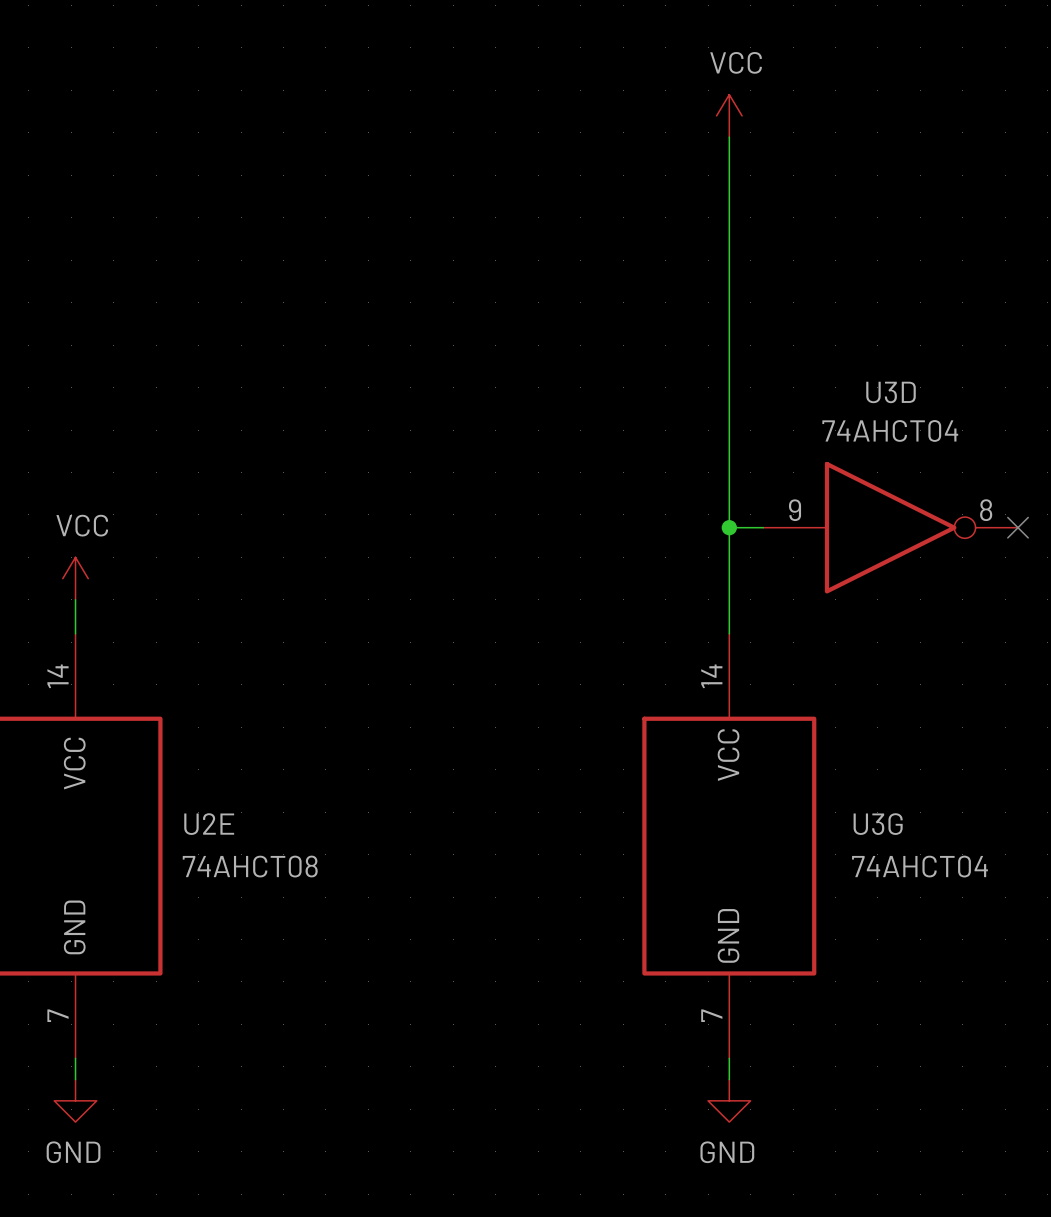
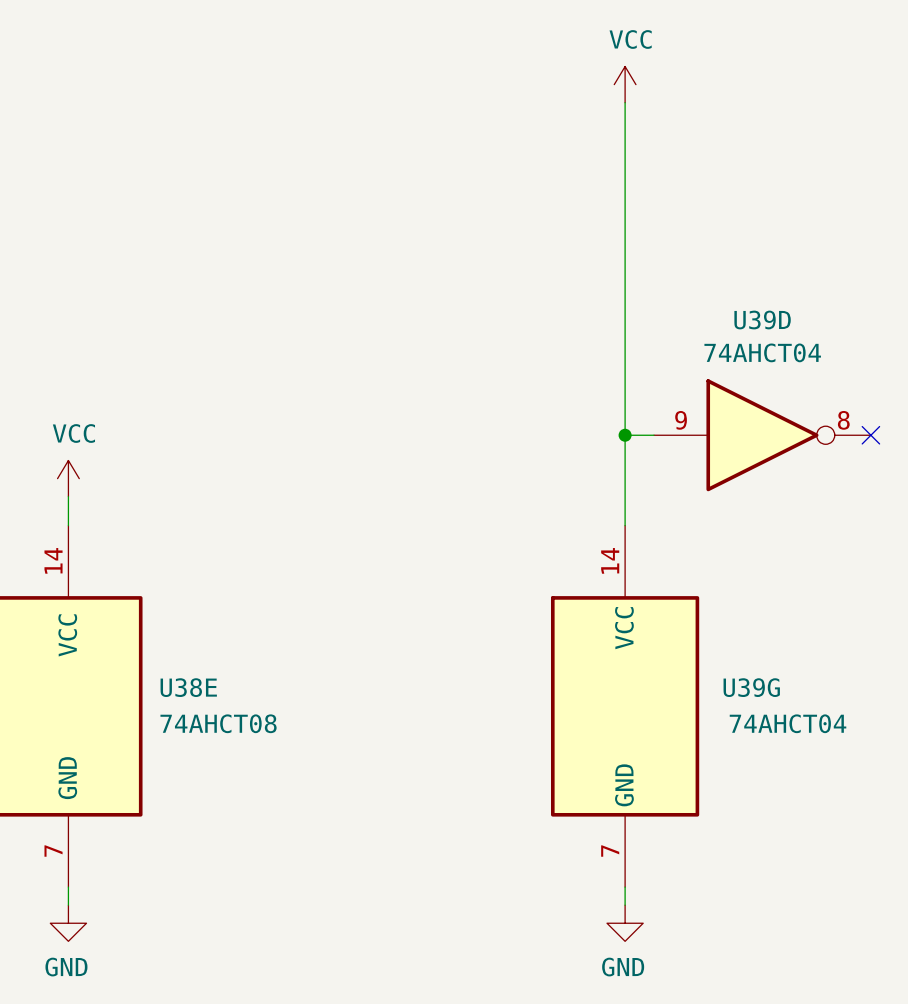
U3D name: U3D (891, 392) -> U39D (762, 320)
U2E name: U2E (209, 824) -> U38E (188, 687)
U3G name: U3G (878, 824) -> U39G (751, 687)

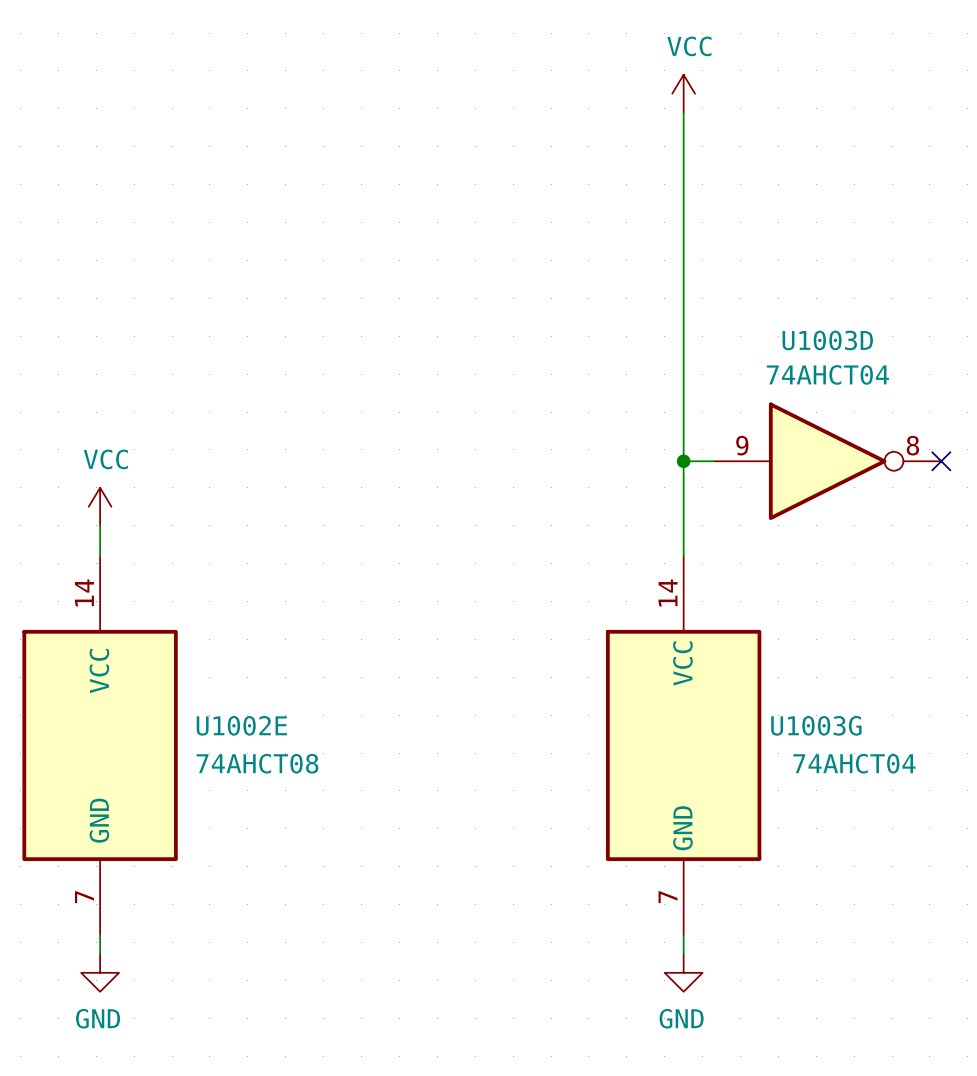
U39D name: U39D (762, 320) -> U1003D (827, 340)
U38E name: U38E (188, 687) -> U1002E (241, 725)
U39G name: U39G (751, 687) -> U1003G (816, 725)

